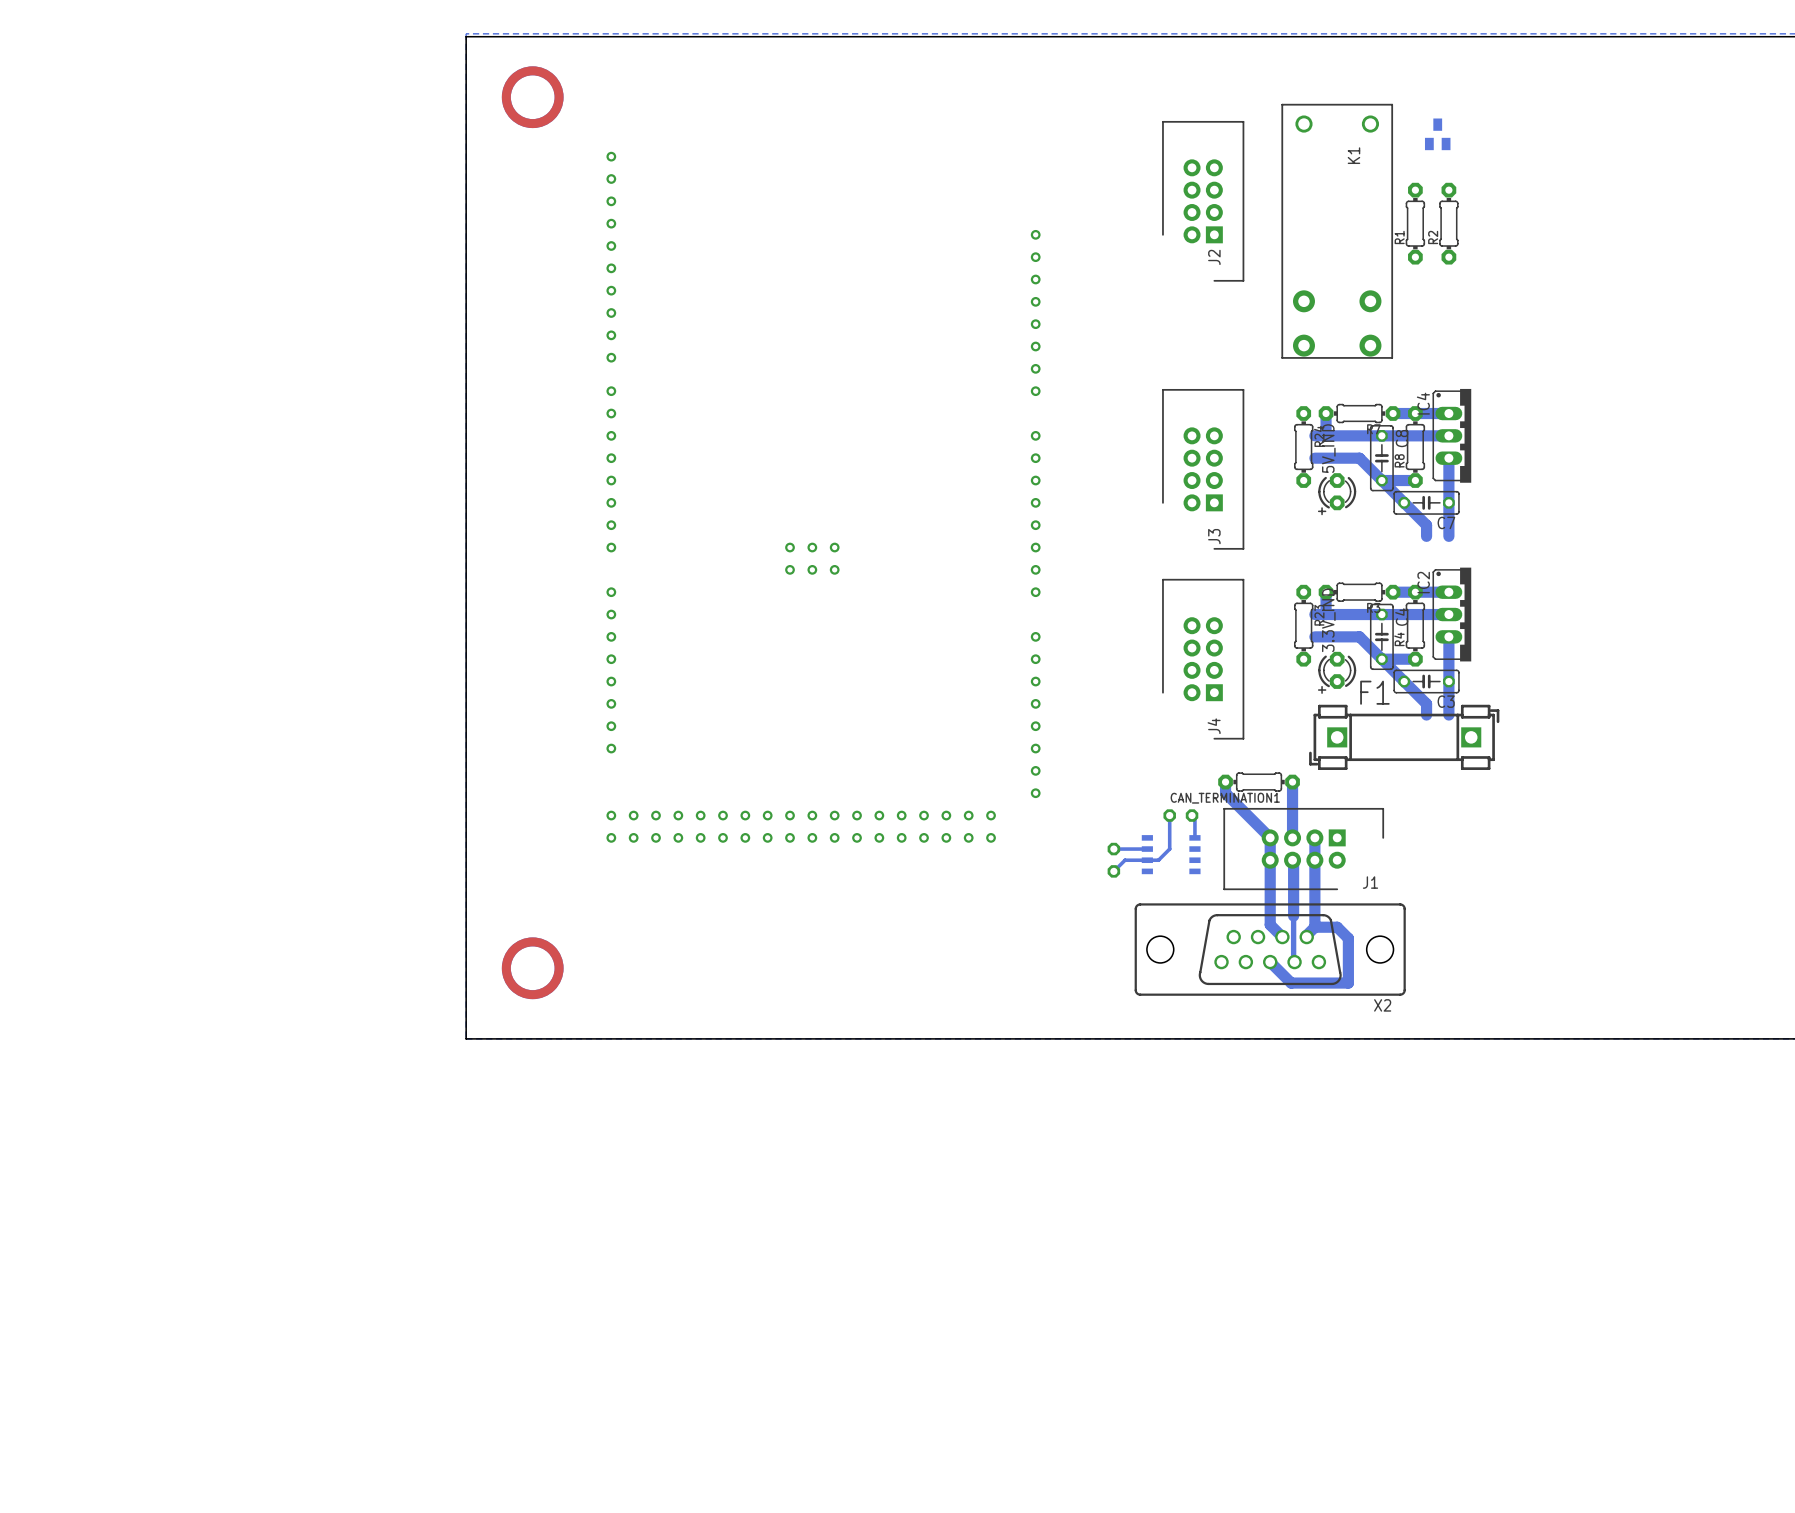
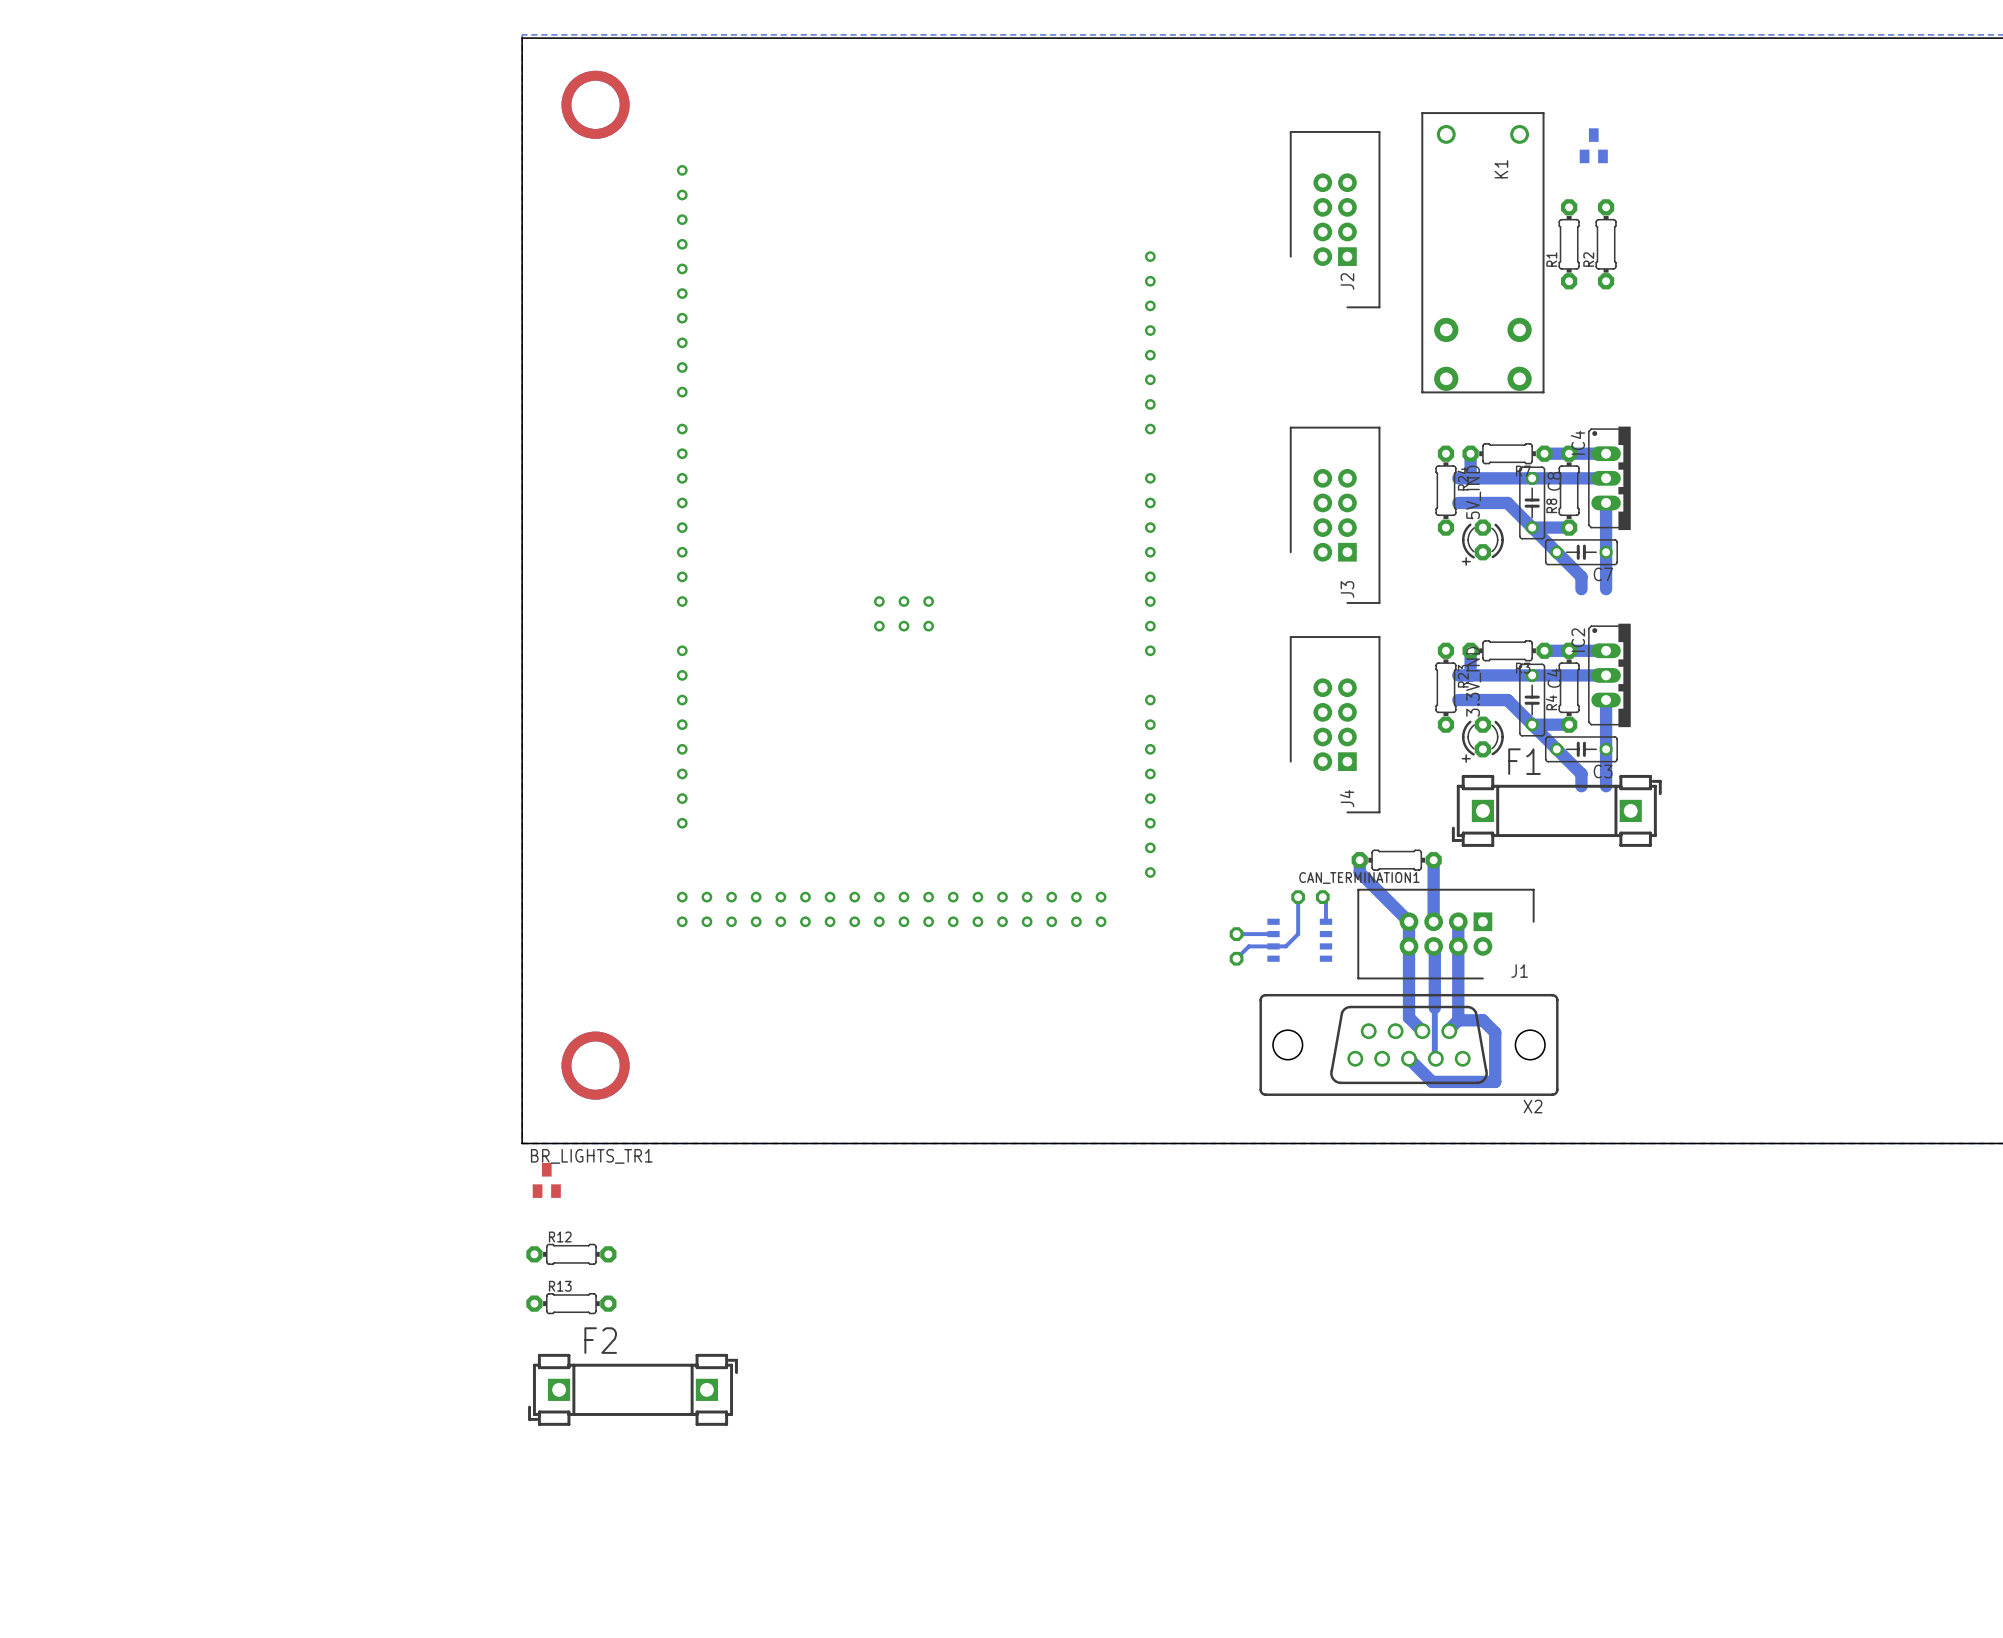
BR_LIGHTS_TR1: none -> (546, 1180)
R12: none -> (571, 1254)
R13: none -> (571, 1303)
F2: none -> (632, 1389)

